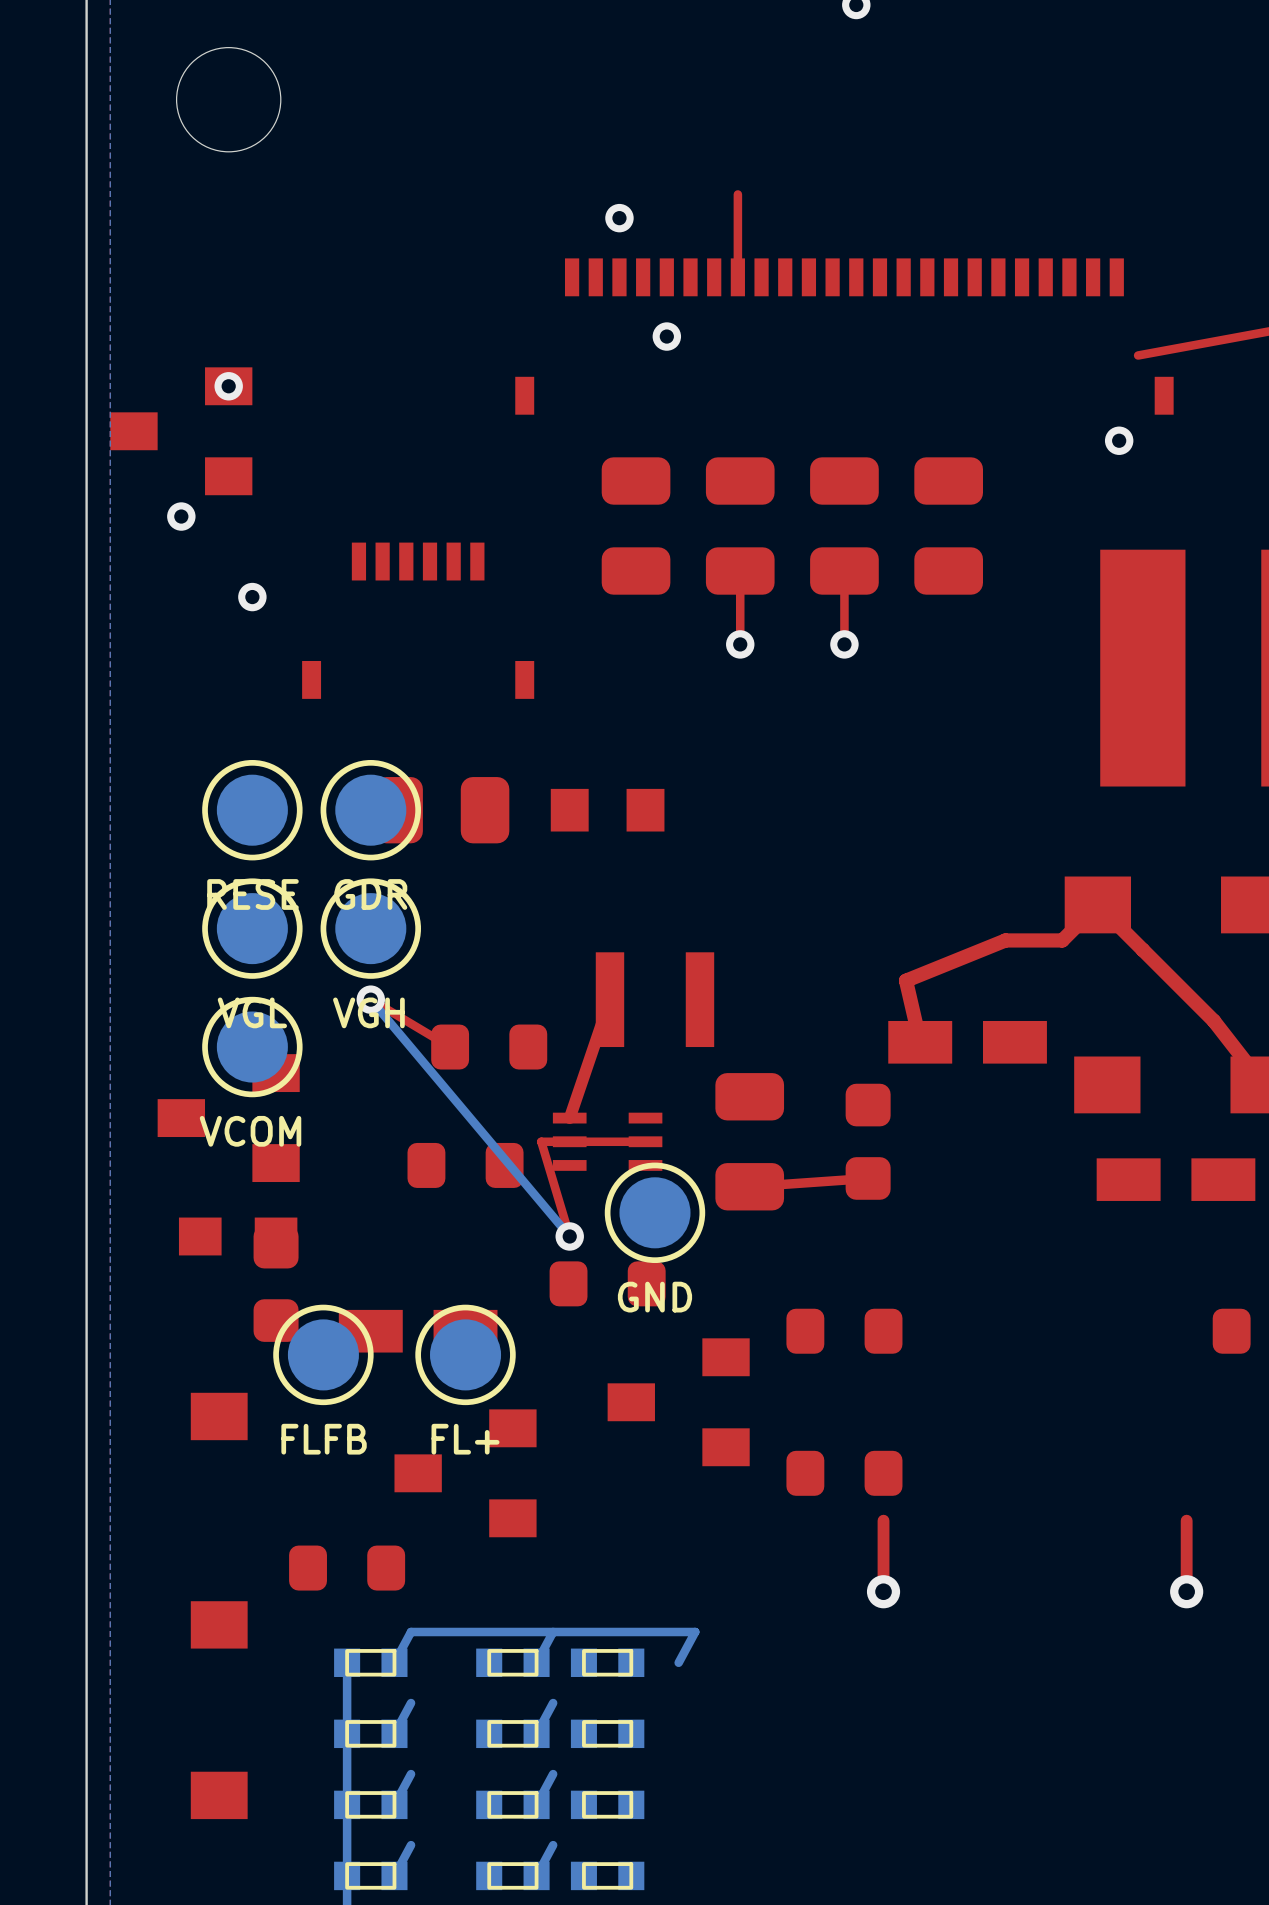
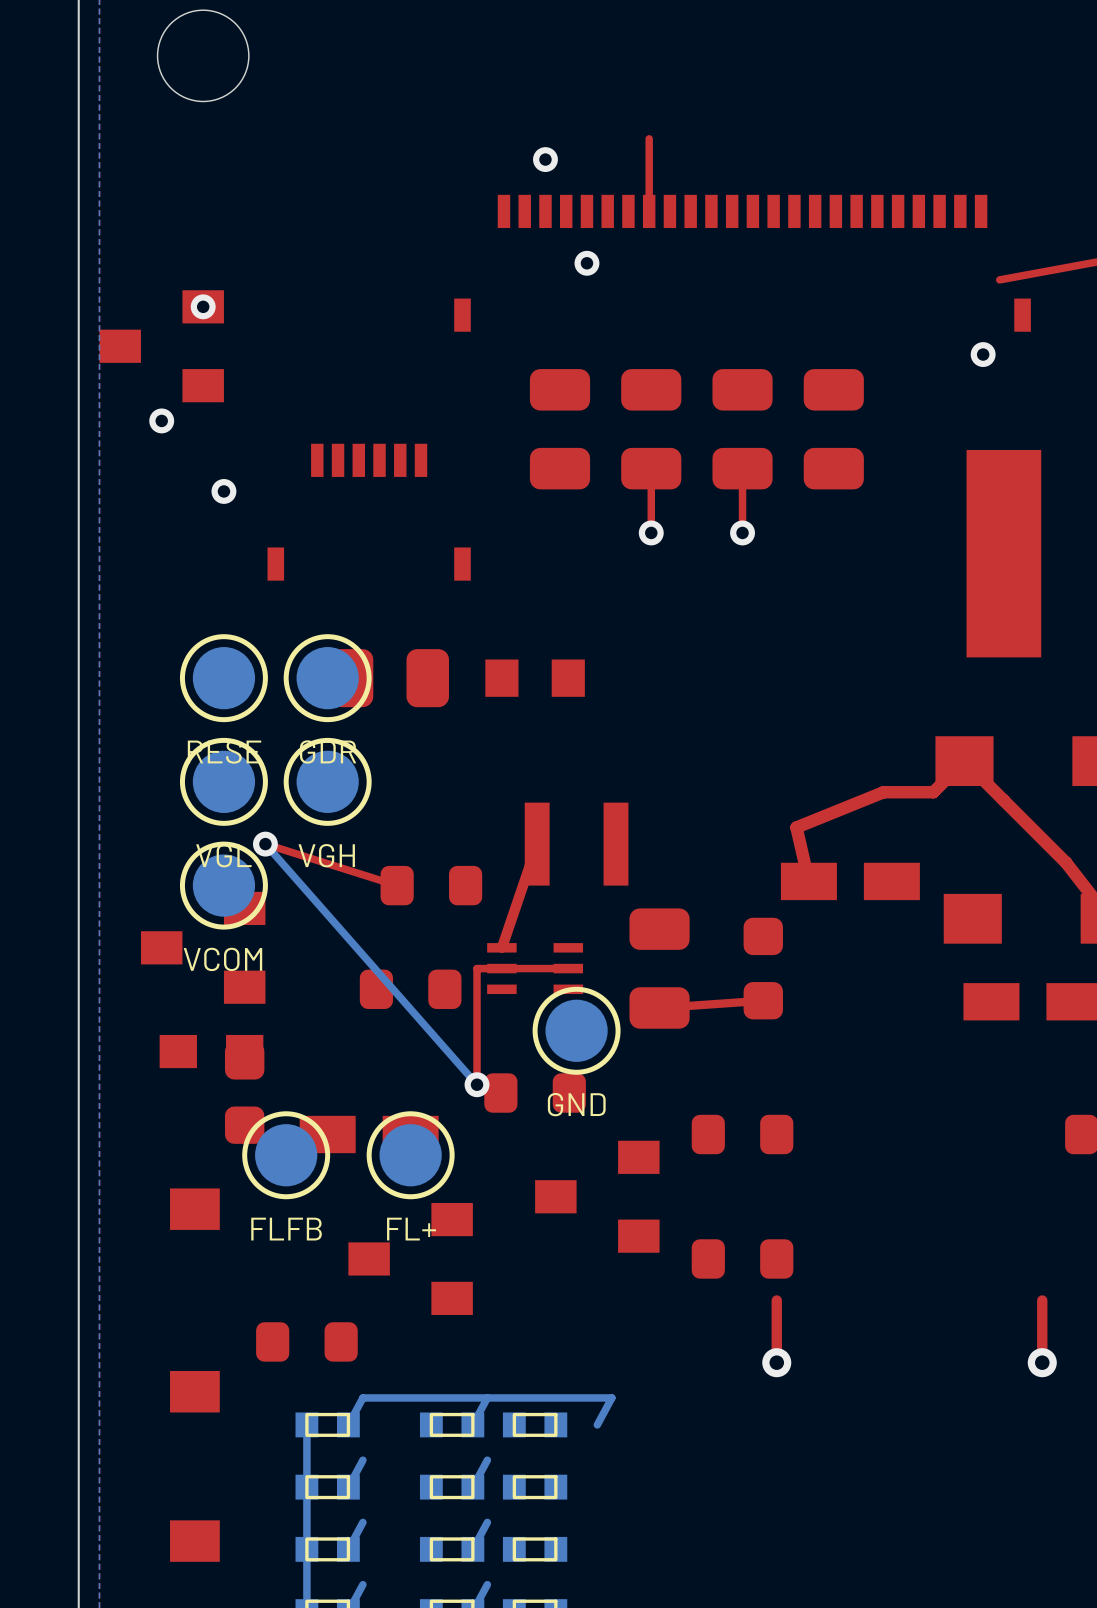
bottom track: none -> (265, 844) (477, 1084)
top track: (370, 999) (450, 1047) -> (265, 844) (397, 885)
bottom track: (370, 999) (569, 1236) -> none
via position: (370, 999) -> (265, 844)
top track: (541, 1141) (569, 1236) -> (477, 968) (477, 1084)
via position: (569, 1236) -> (477, 1084)

